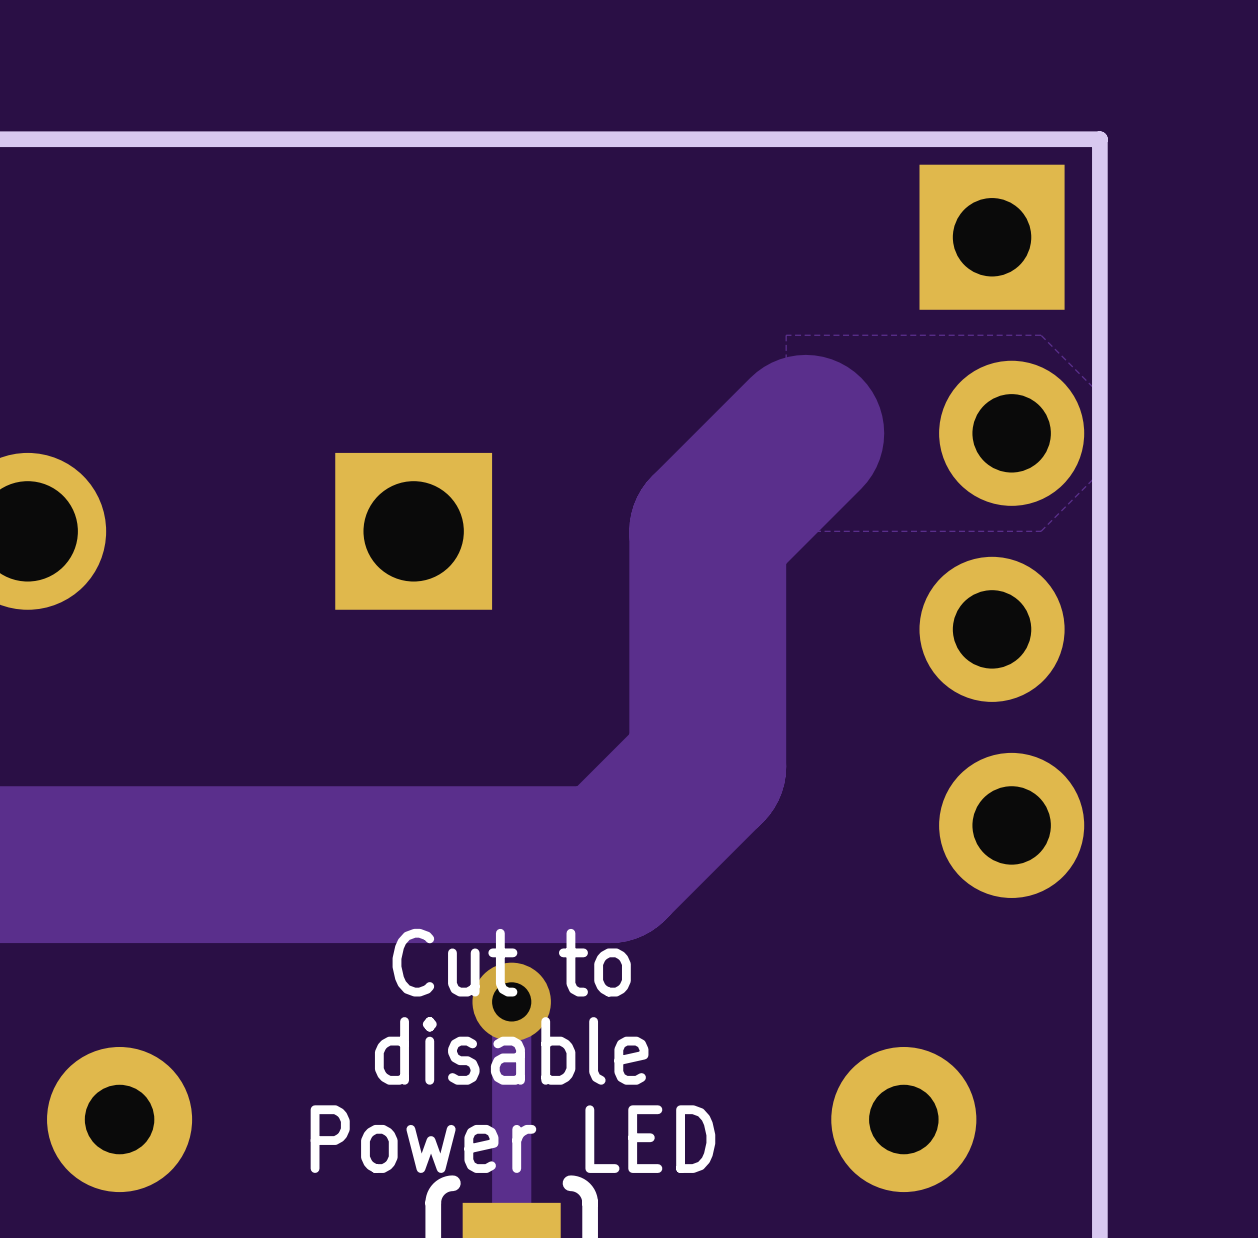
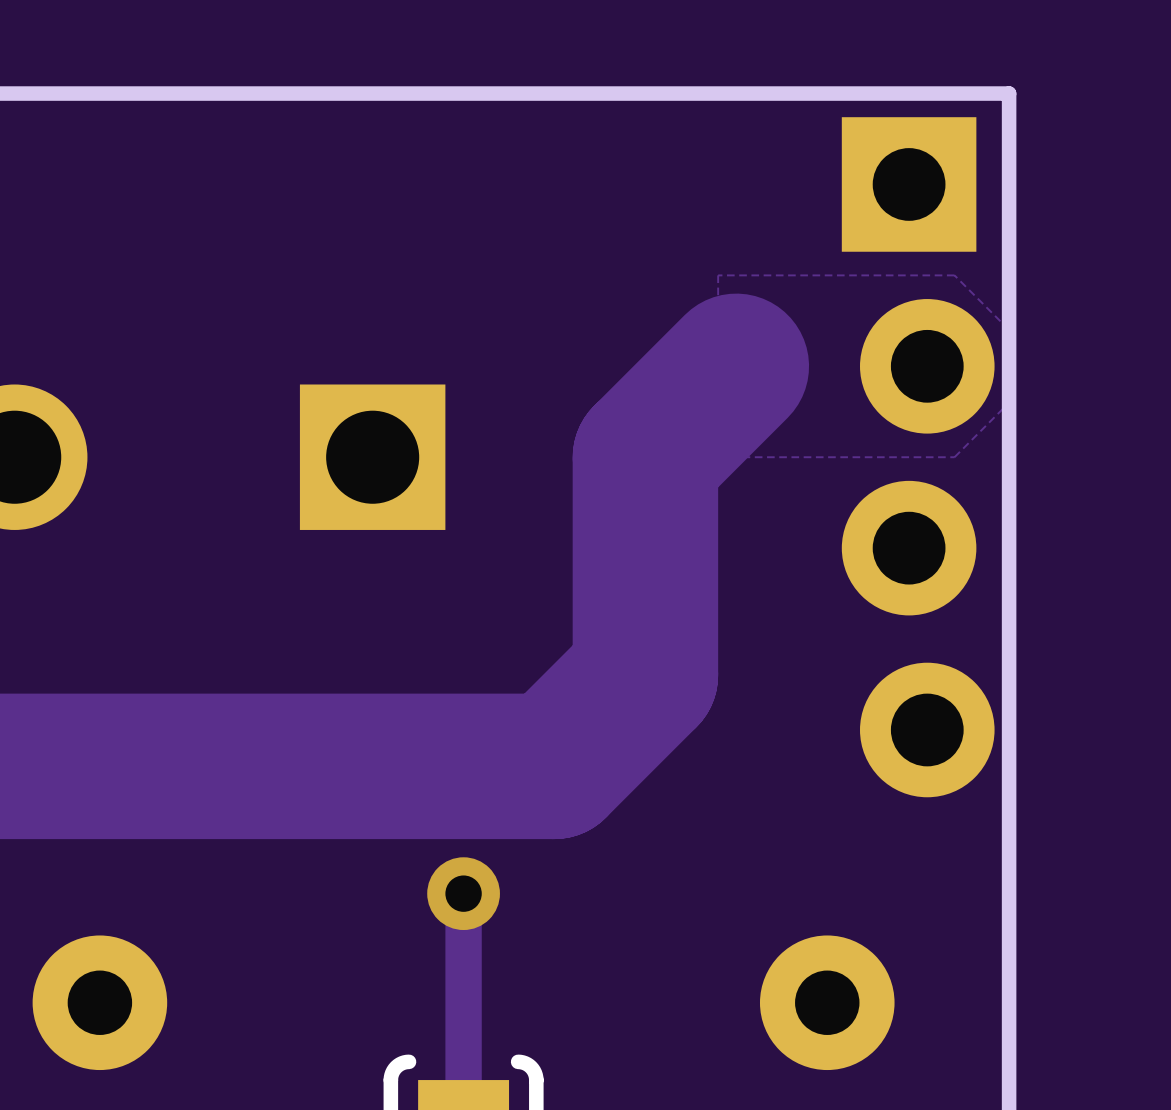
text: Cut to (511, 962) -> none
text: disable (511, 1050) -> none
text: Power LED (512, 1139) -> none

